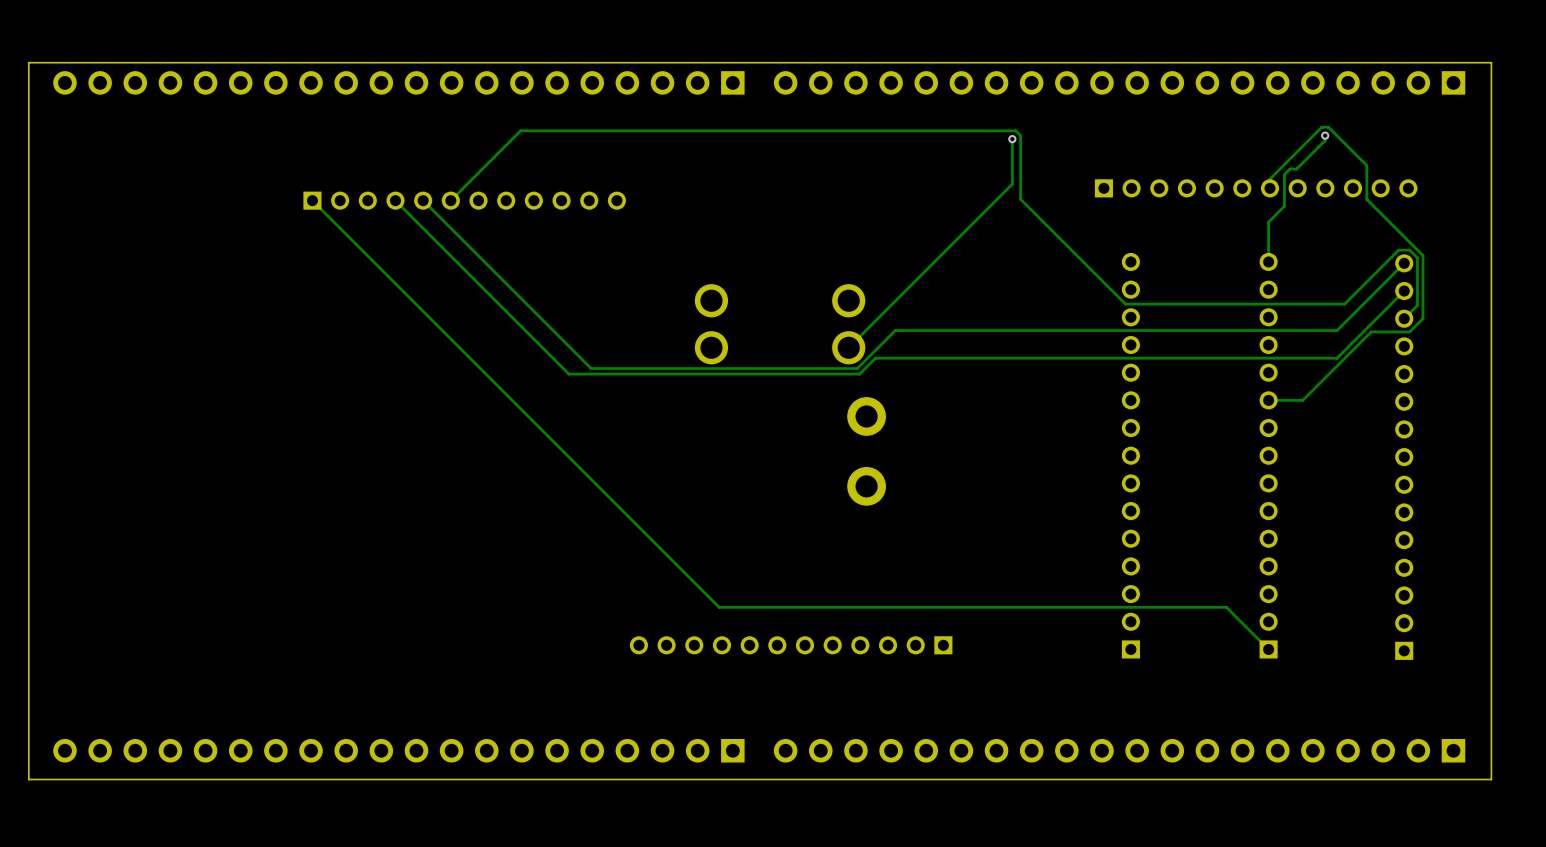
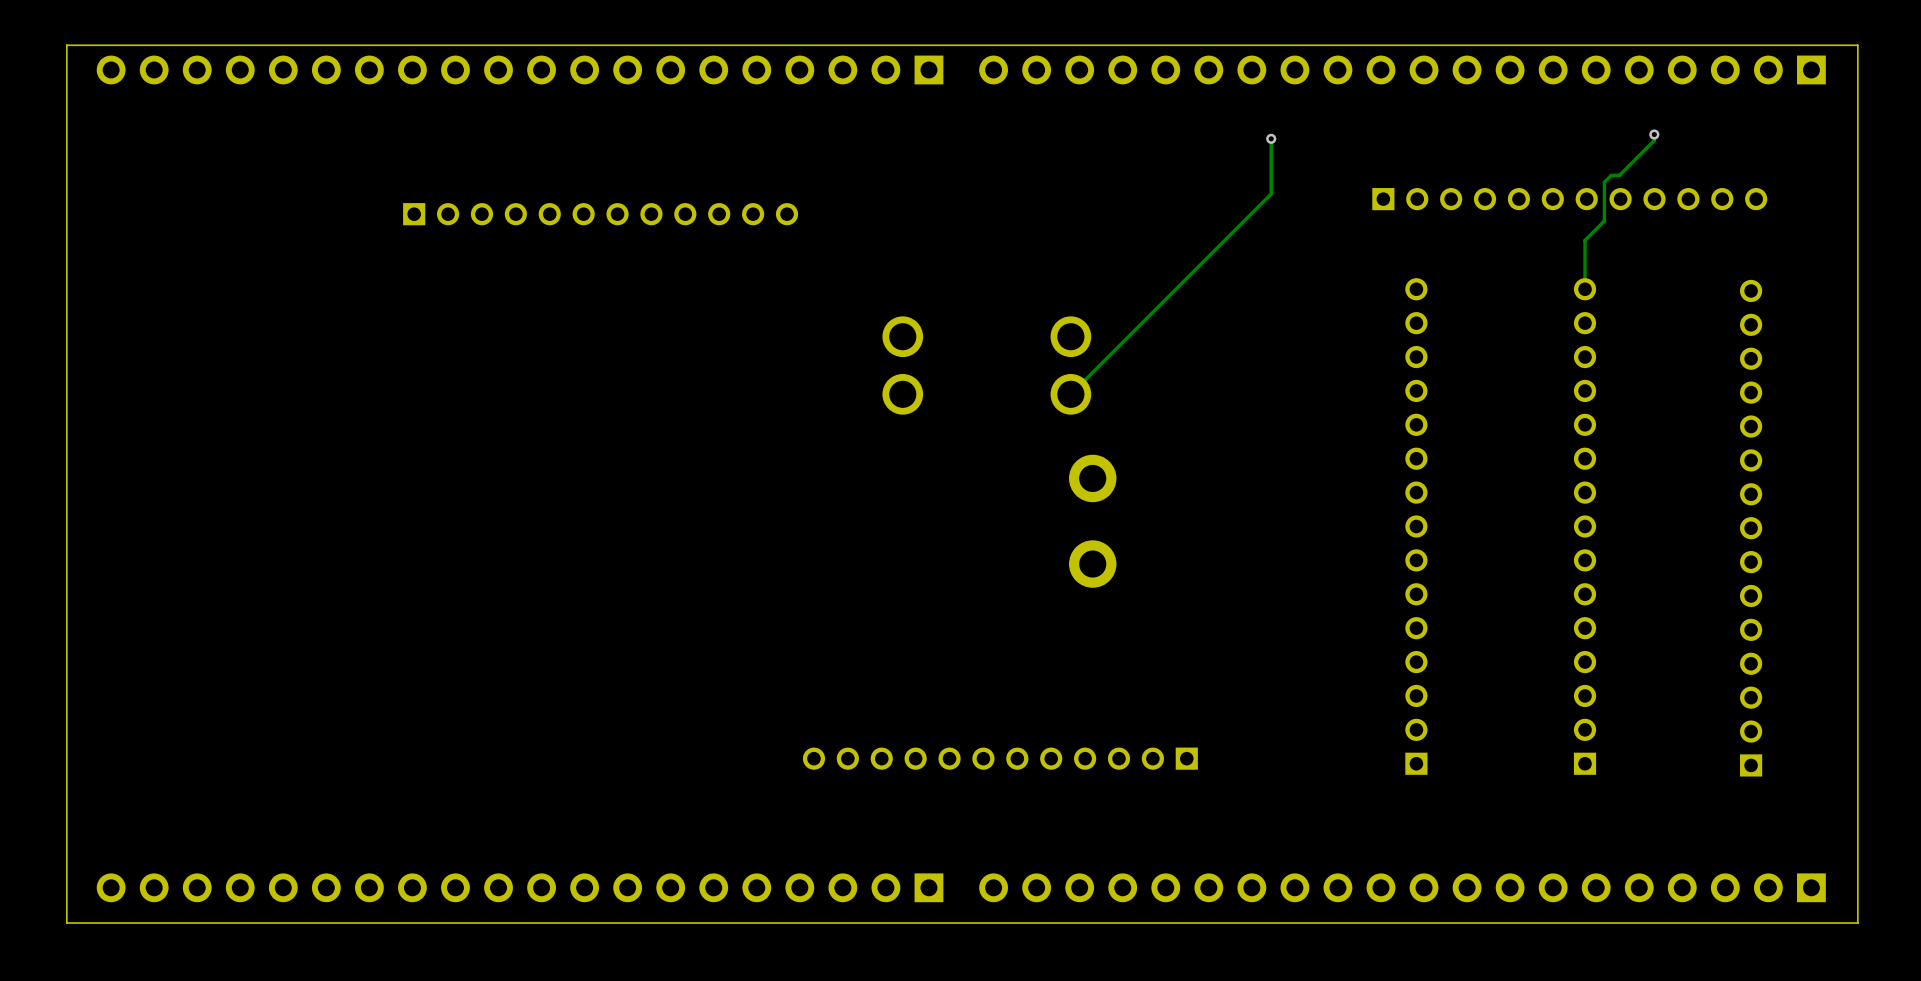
track: (1269, 188) (1269, 179) (1321, 127) (1328, 127) (1366, 165) (1366, 199) (1422, 255) (1422, 318) (1409, 331) (1371, 331) (1302, 400) (1268, 400) -> none
track: (312, 200) (719, 607) (1226, 607) (1268, 649) -> none
track: (395, 200) (568, 374) (859, 374) (875, 358) (1337, 358) (1404, 291) -> none
track: (423, 200) (591, 368) (857, 368) (895, 330) (1337, 330) (1404, 263) -> none
track: (450, 200) (520, 130) (1015, 130) (1020, 135) (1020, 199) (1125, 304) (1344, 304) (1398, 250) (1409, 250) (1417, 257) (1417, 305) (1404, 318) -> none

